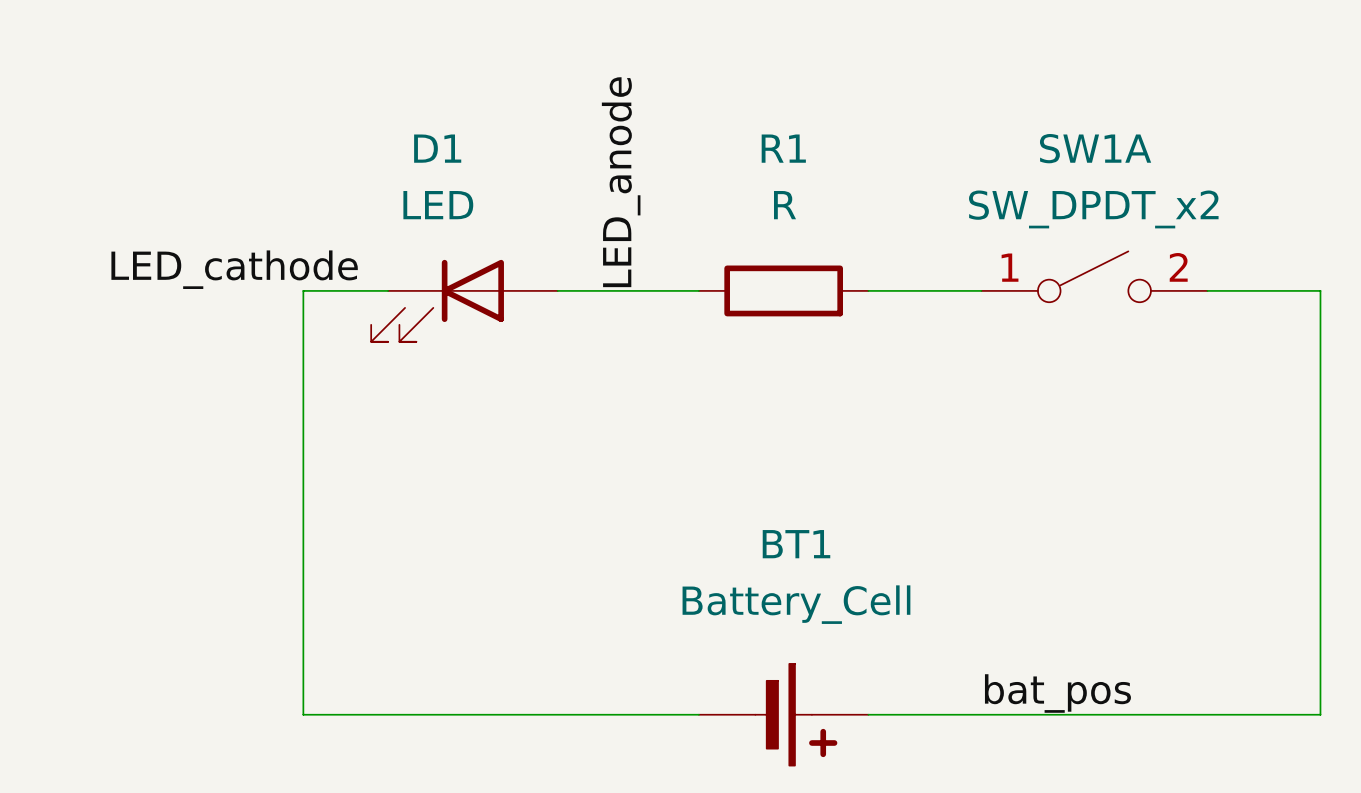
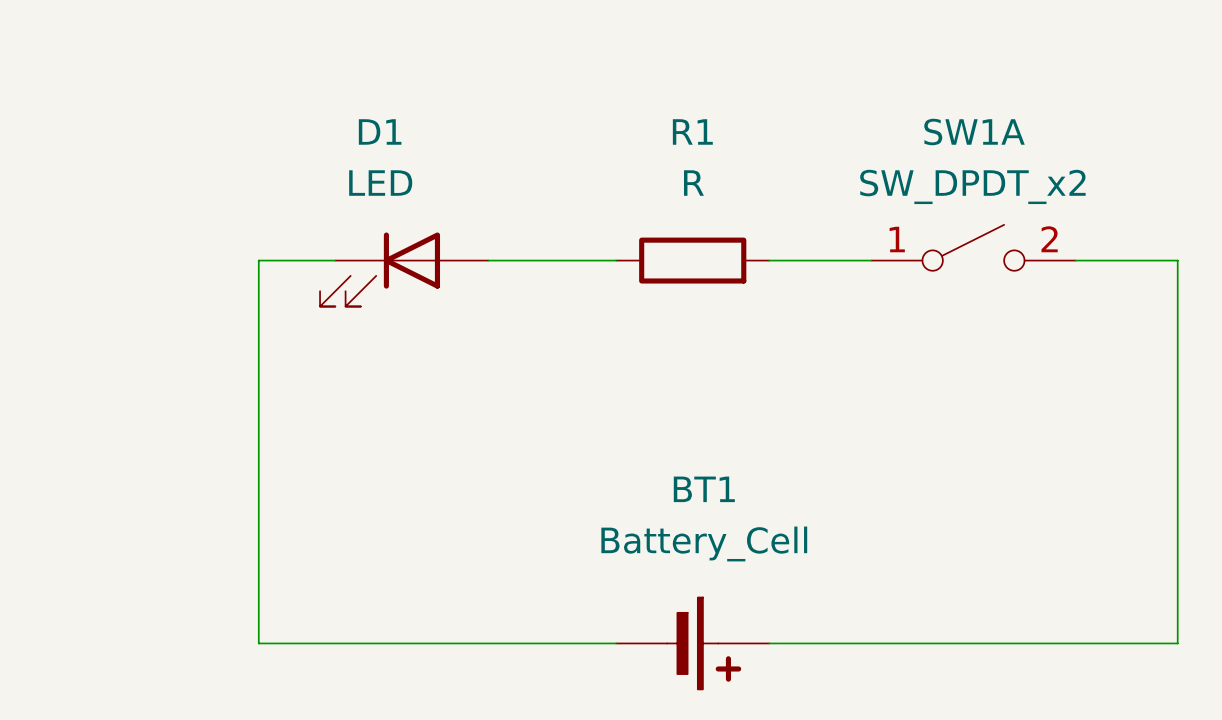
label: LED_anode (621, 182) -> none
label: LED_cathode (234, 269) -> none
label: bat_pos (1057, 693) -> none

